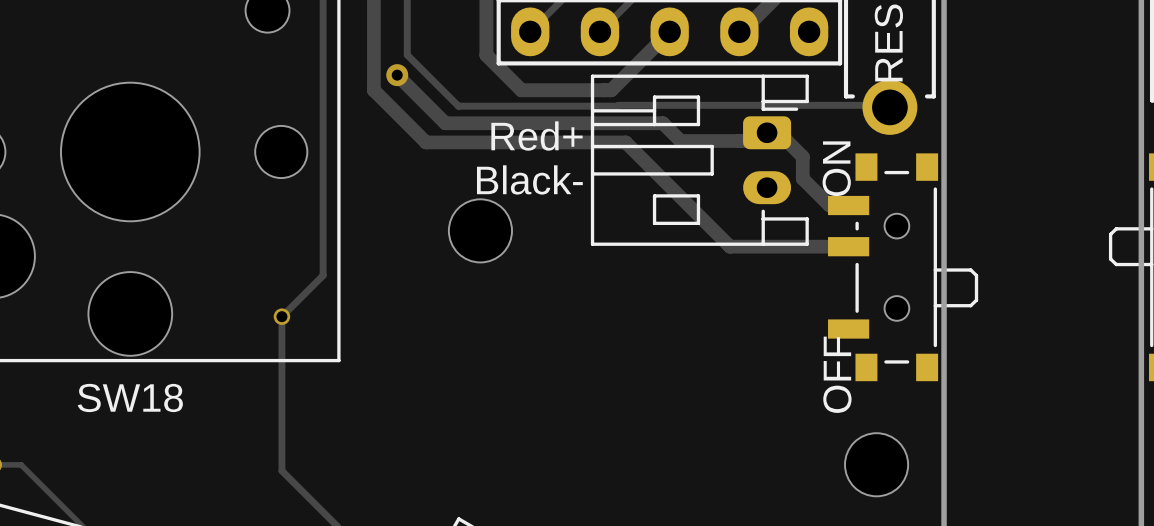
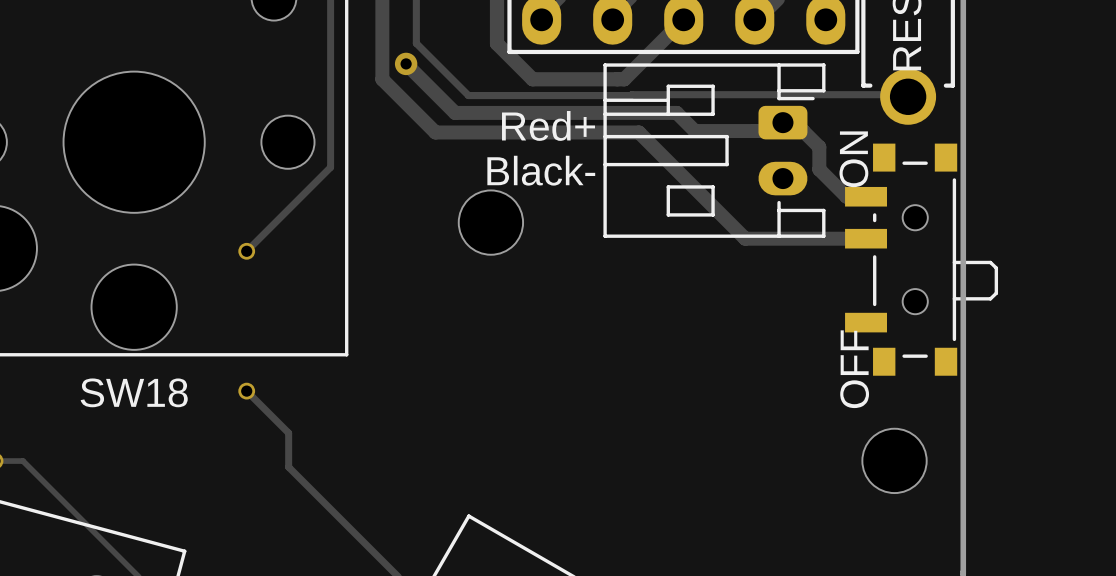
track: (323, 176) (323, 275) (281, 316) (281, 437) -> (330, 167) (246, 251)
via: none -> (246, 251)
via: (281, 316) -> none
track: none -> (246, 391) (288, 433)
via: none -> (246, 391)

